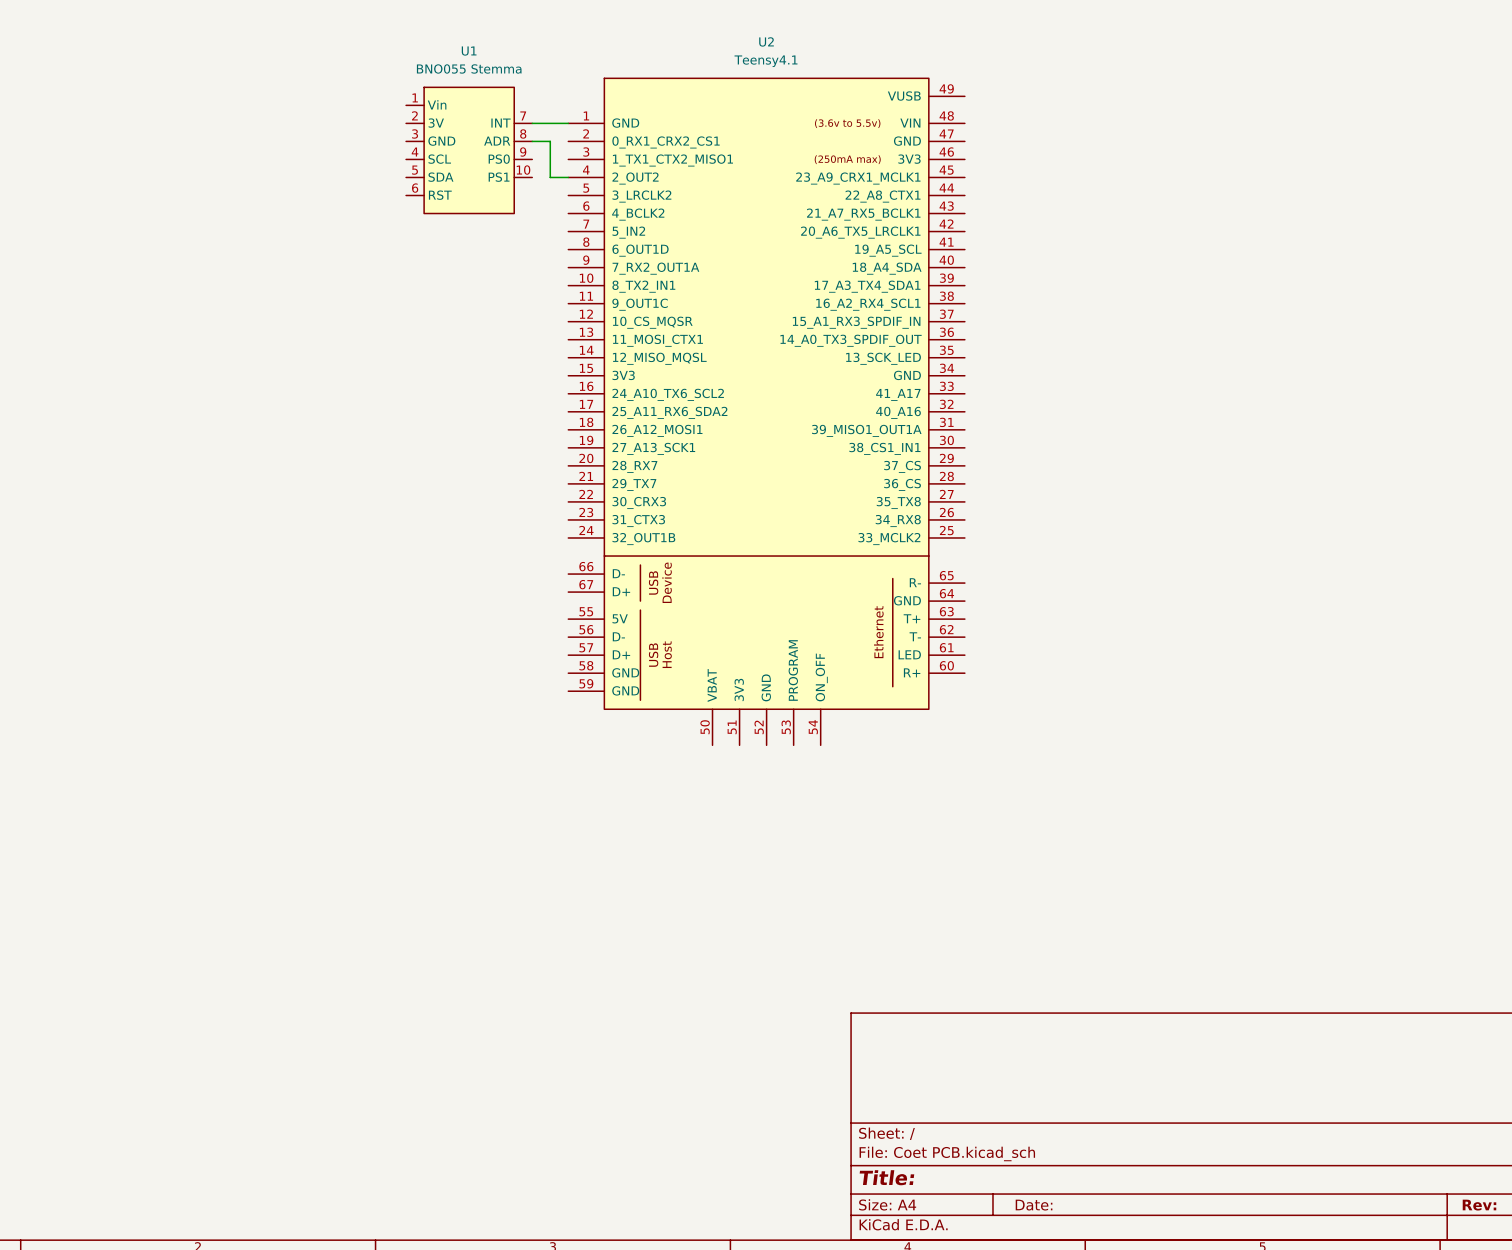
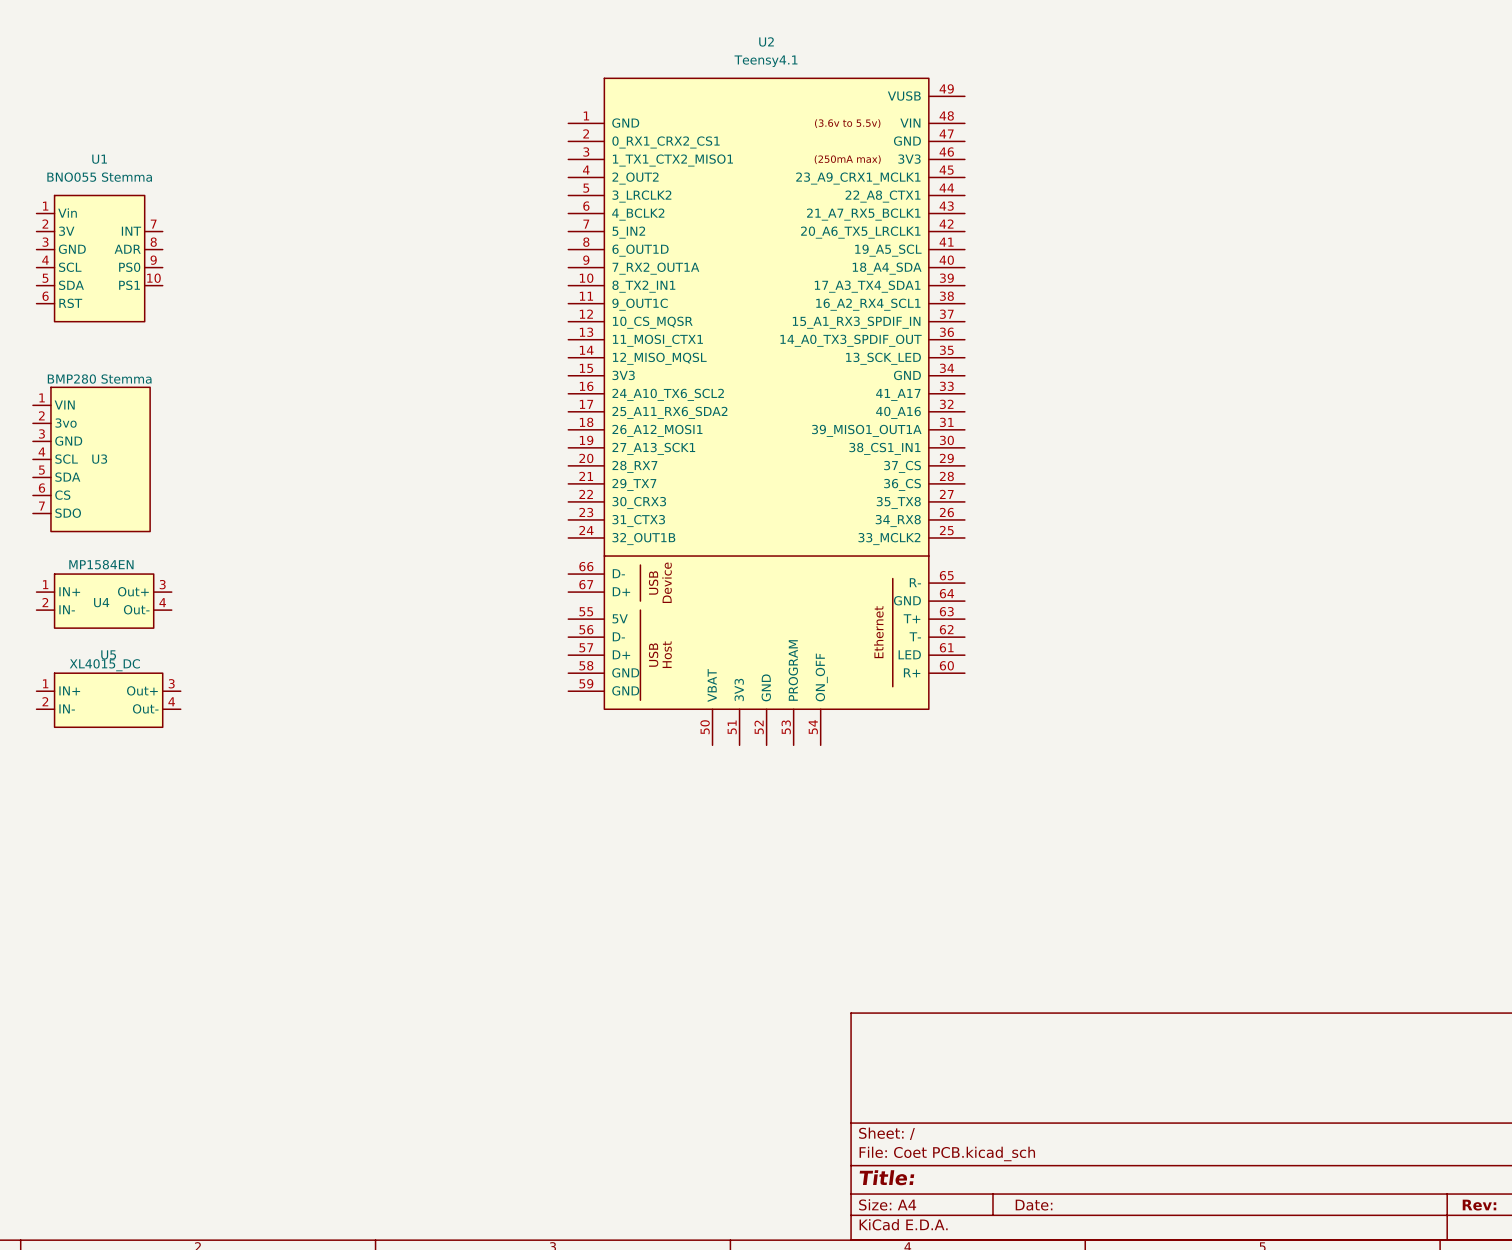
wire: (532, 123) (568, 123) -> none
wire: (532, 141) (550, 141) (550, 177) (568, 177) -> none
U1 position: (469, 150) -> (99, 258)
U3: none -> BMP280 Stemma (91, 459)
U4: none -> MP1584EN (104, 601)
U5: none -> XL4015_DC (108, 700)

